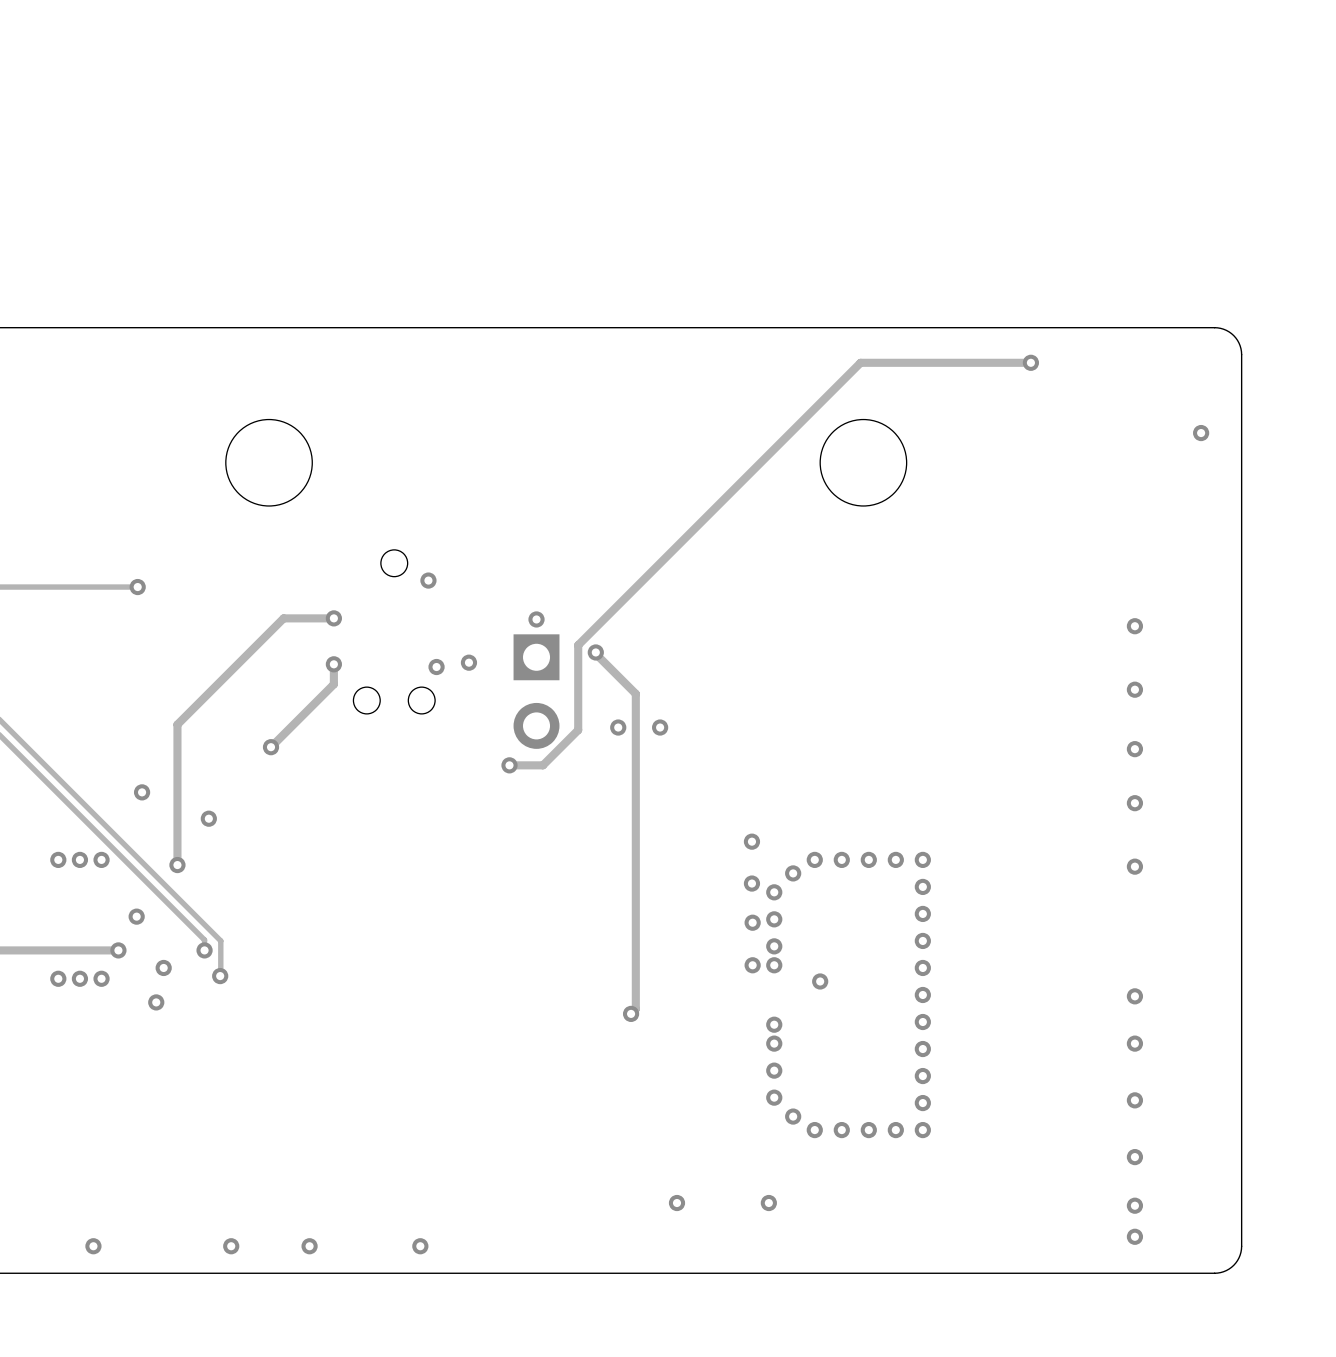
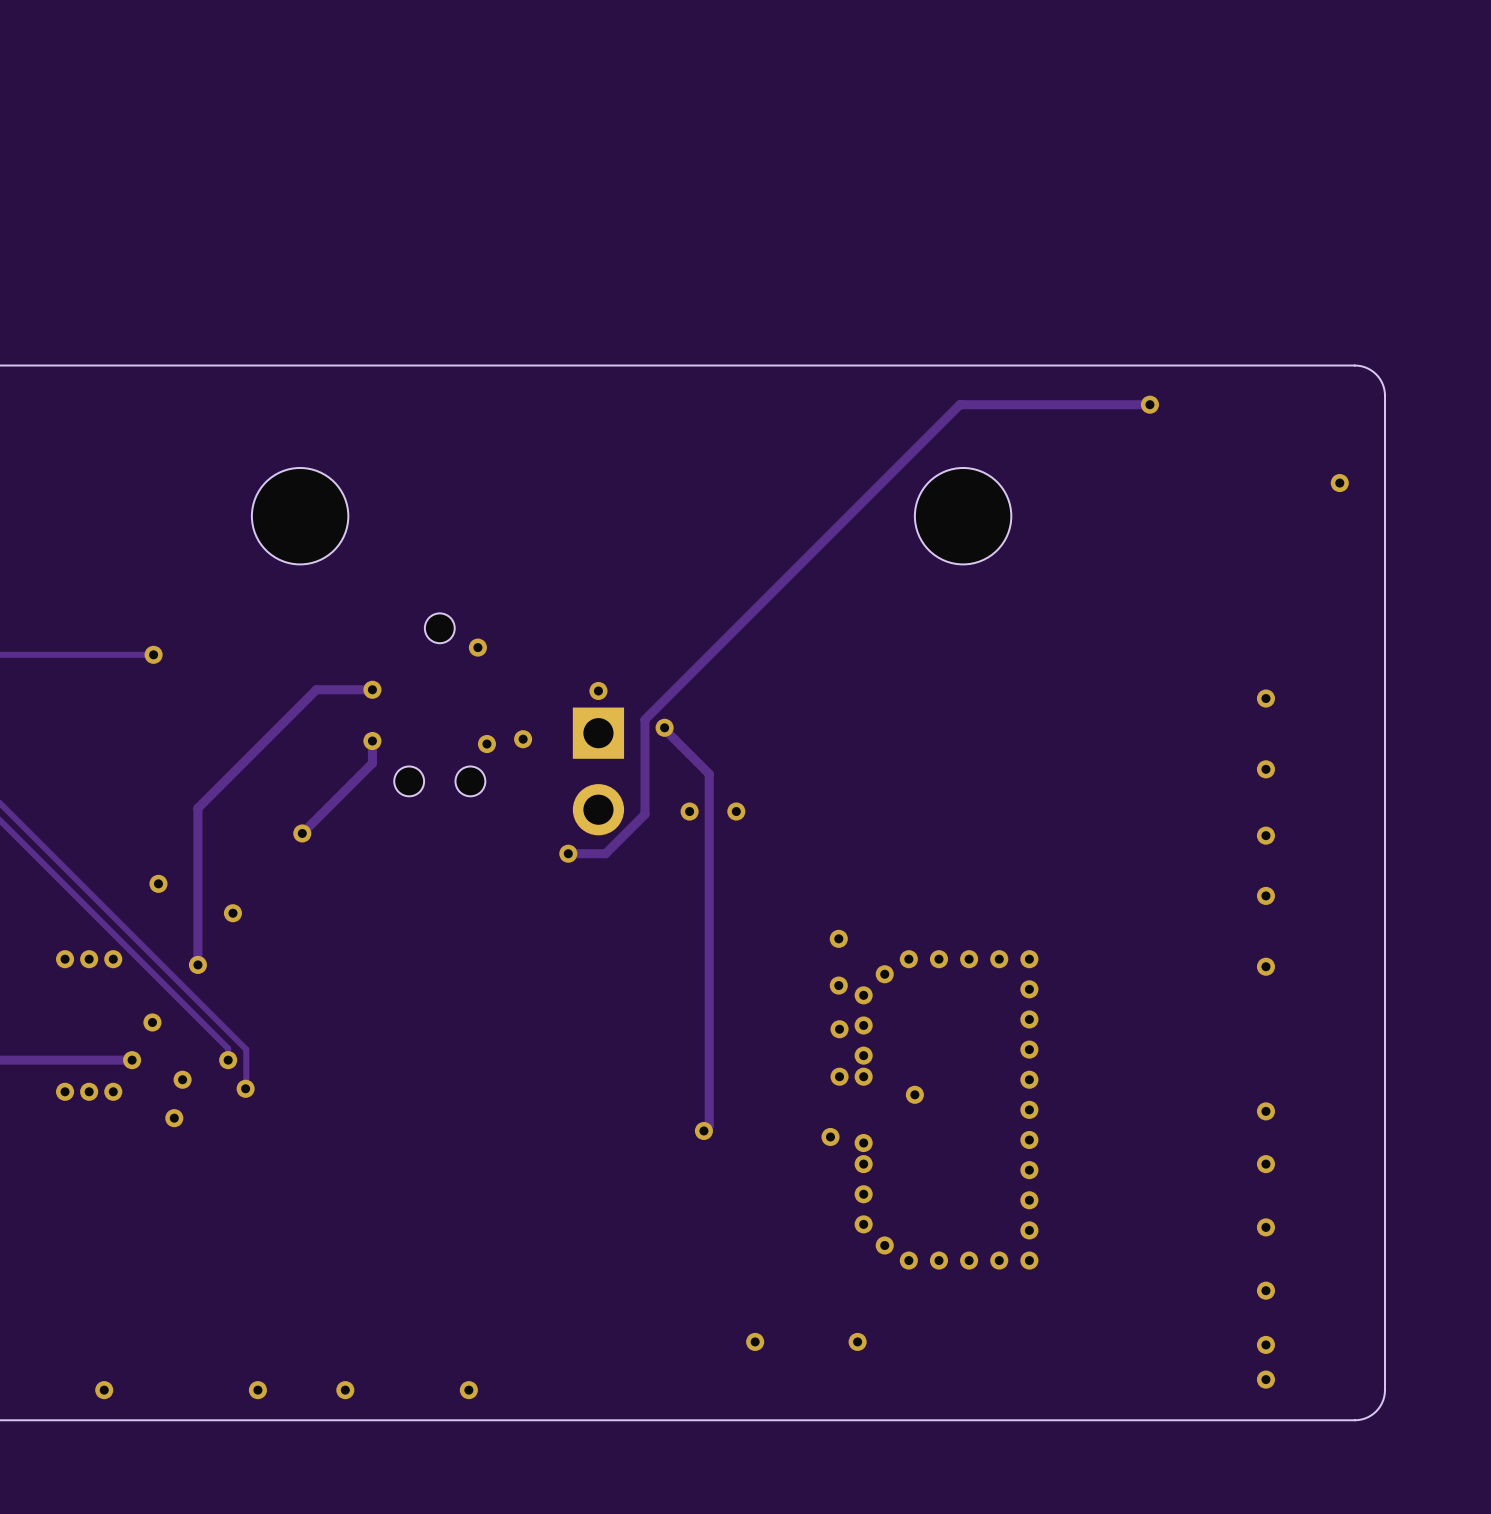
via: none -> (830, 1136)

